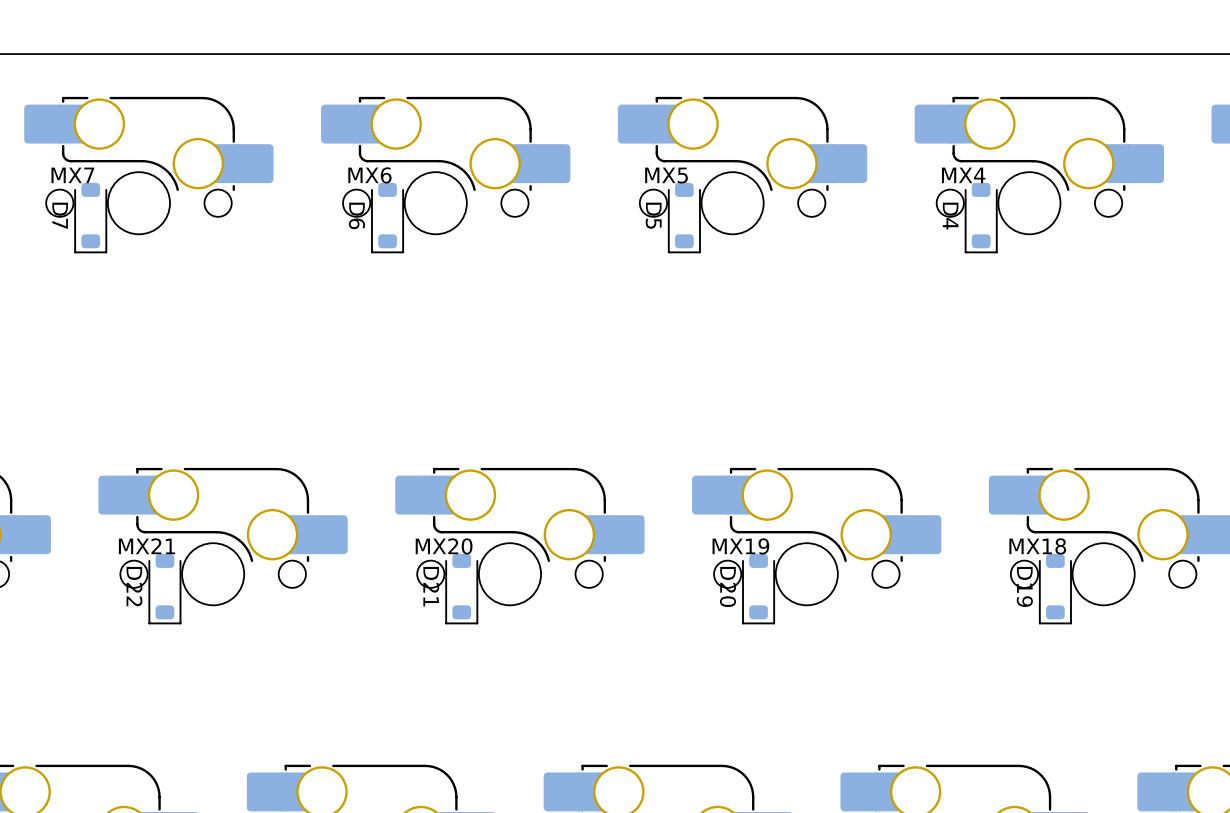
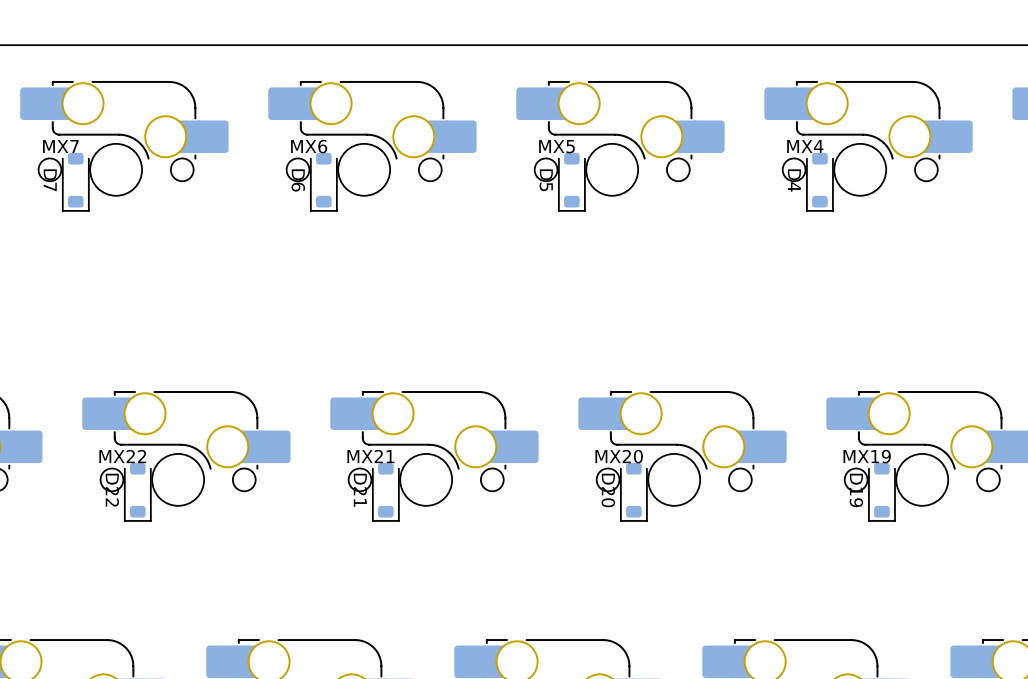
MX21 name: MX21 (147, 546) -> MX22 (122, 456)
MX20 name: MX20 (444, 546) -> MX21 (370, 456)
MX19 name: MX19 (740, 546) -> MX20 (619, 456)
MX18 name: MX18 (1037, 546) -> MX19 (867, 456)

